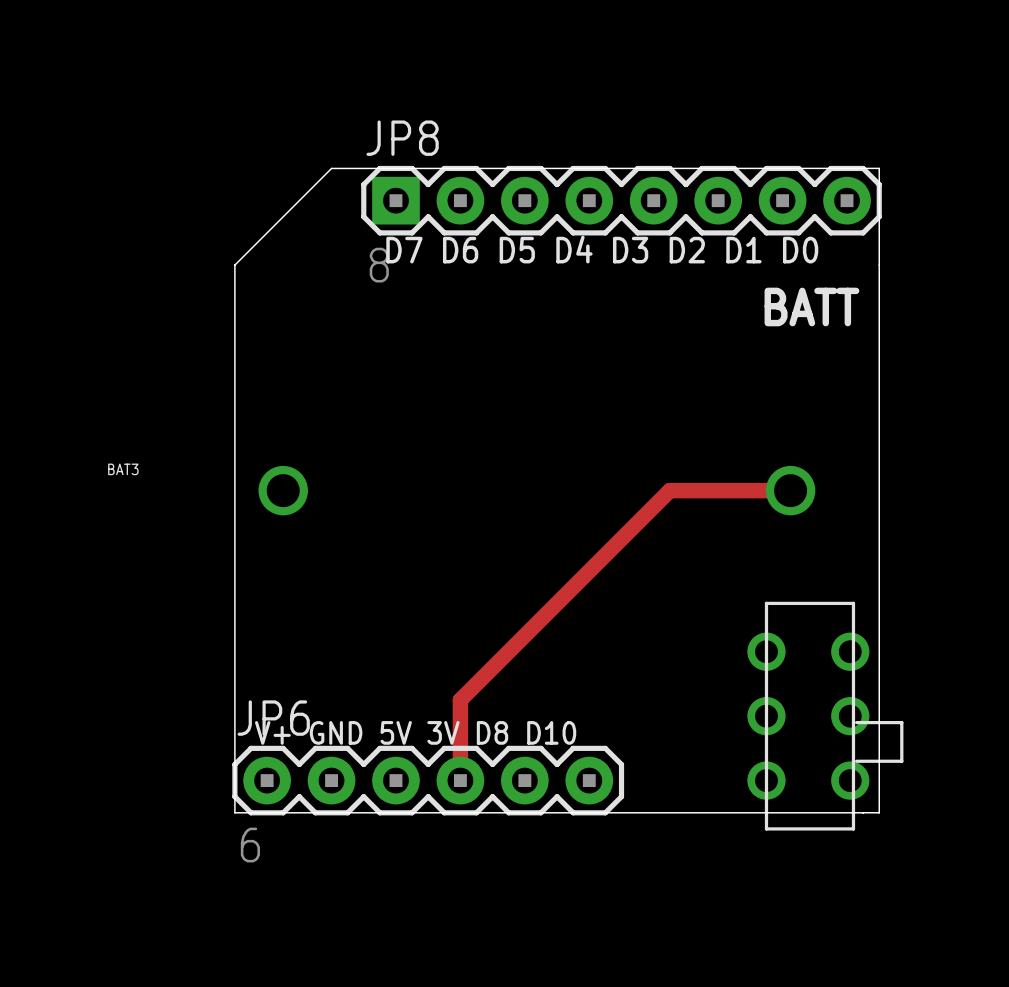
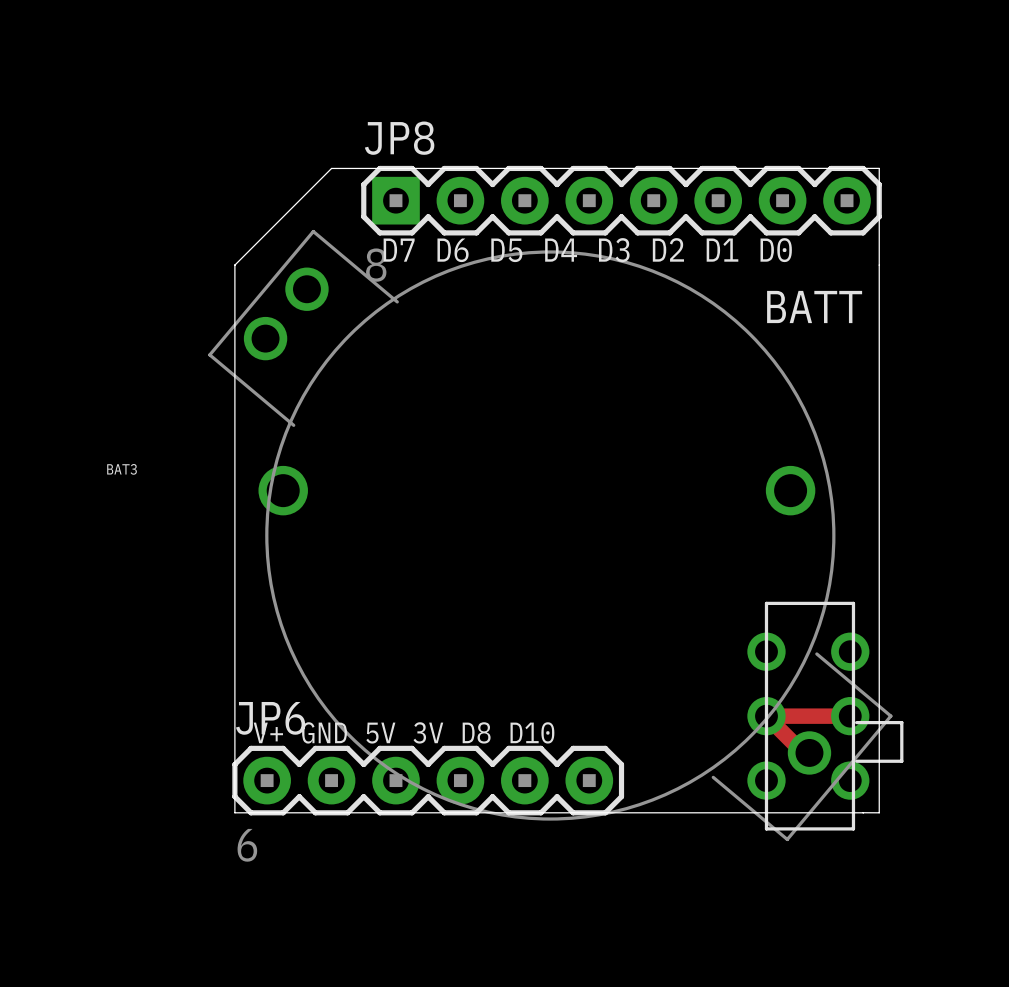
track: (790, 490) (669, 490) (460, 700) (460, 780) -> none
part: none -> (550, 535)
track: none -> (850, 716) (766, 716) (803, 752) (809, 752)

